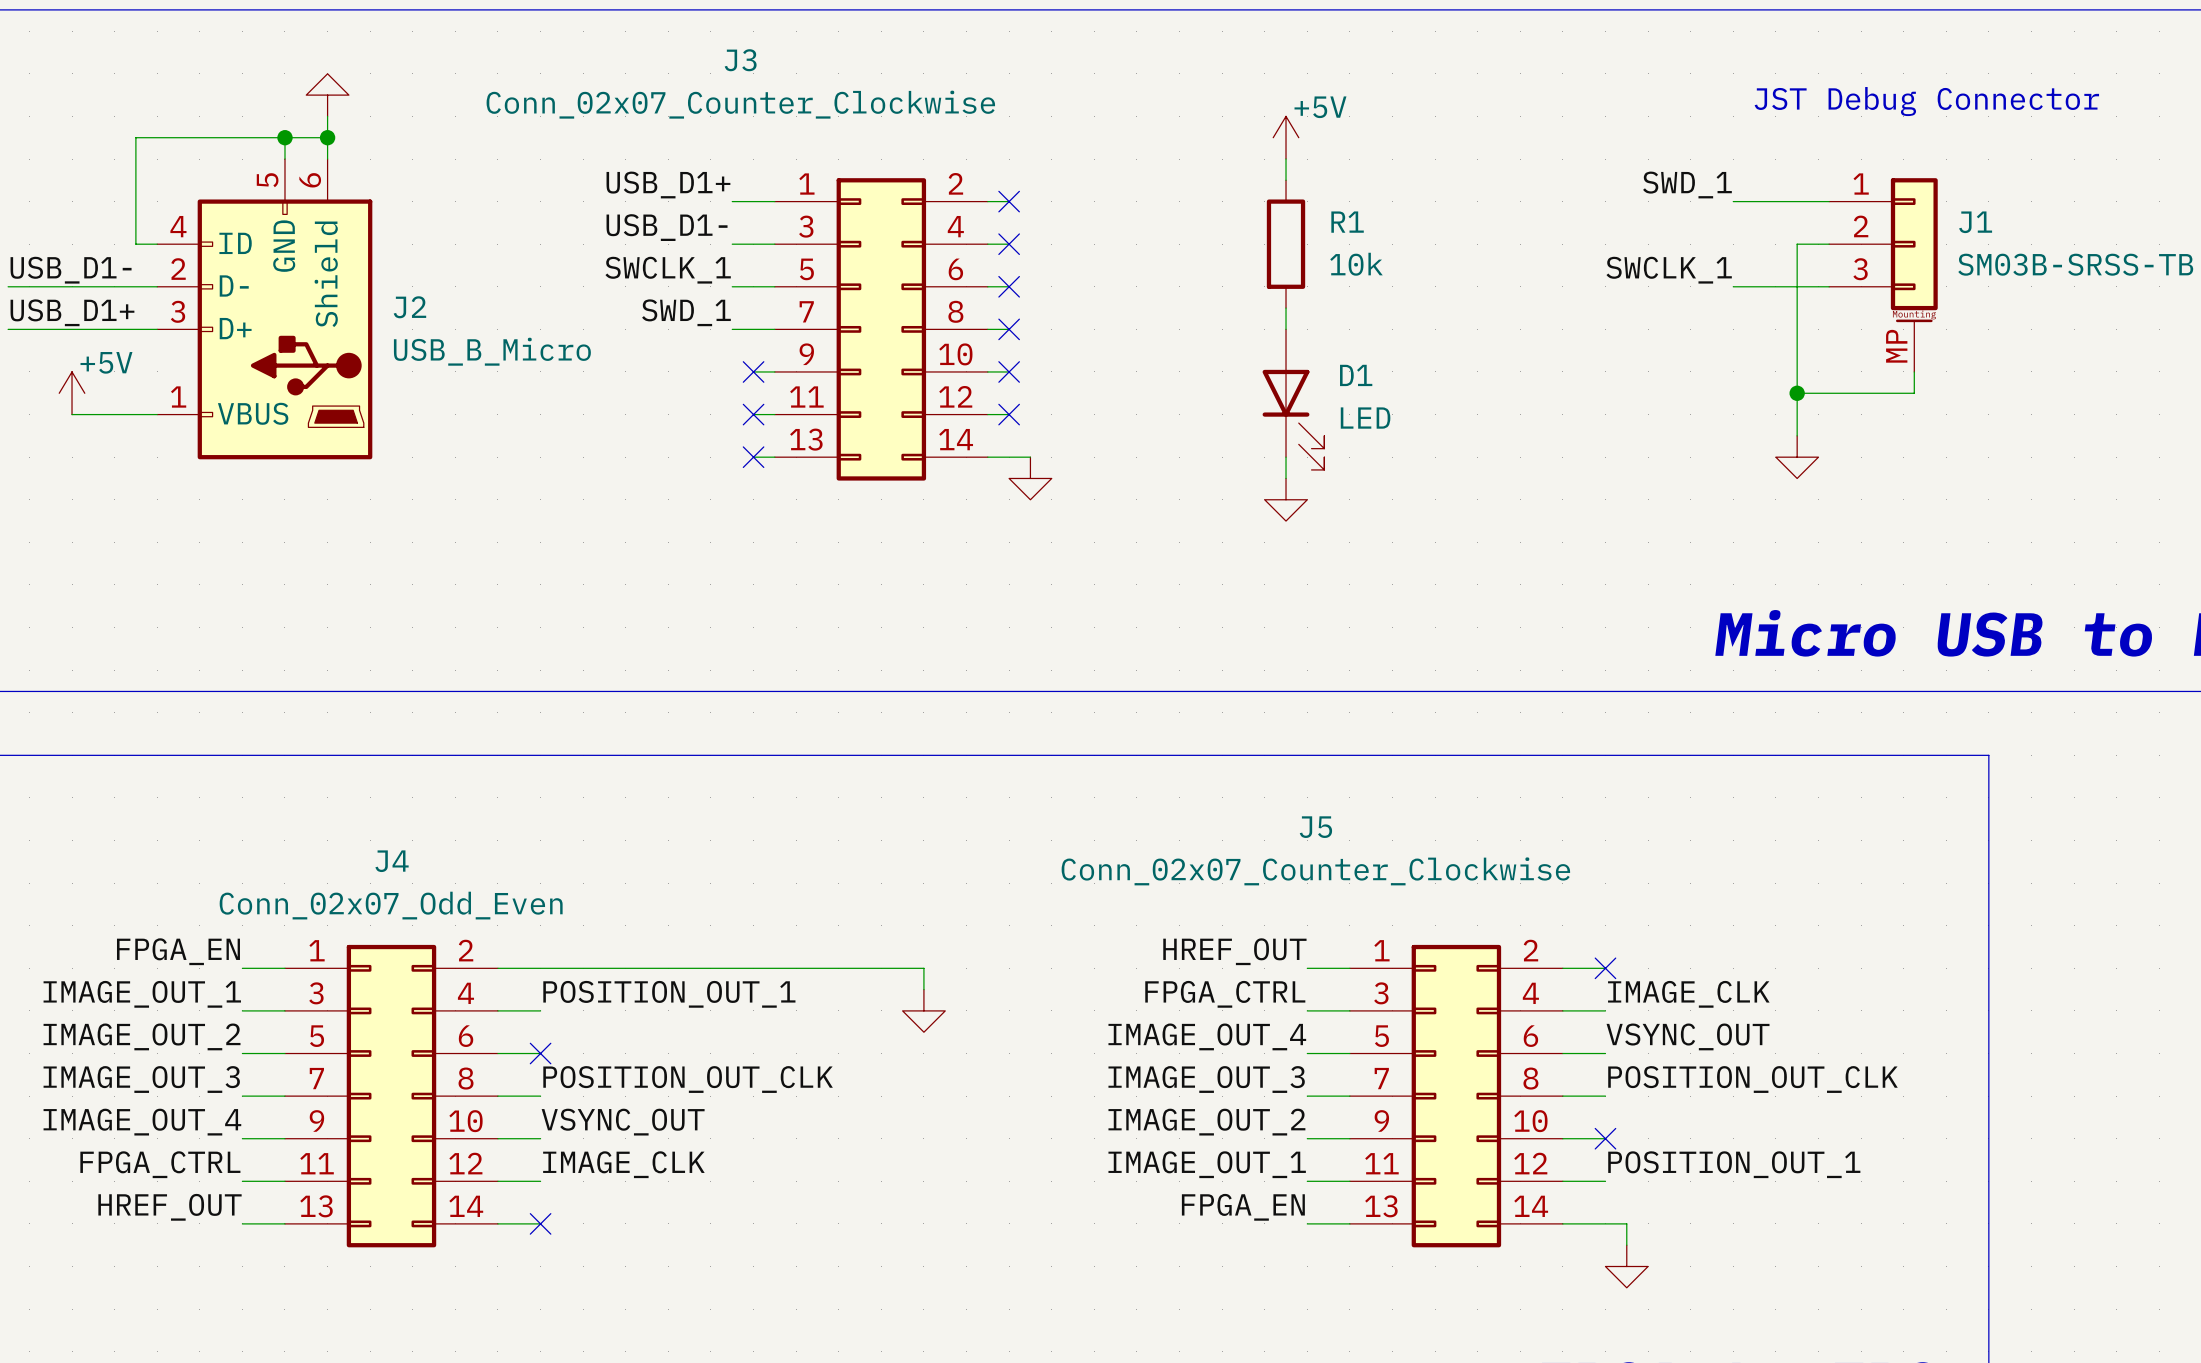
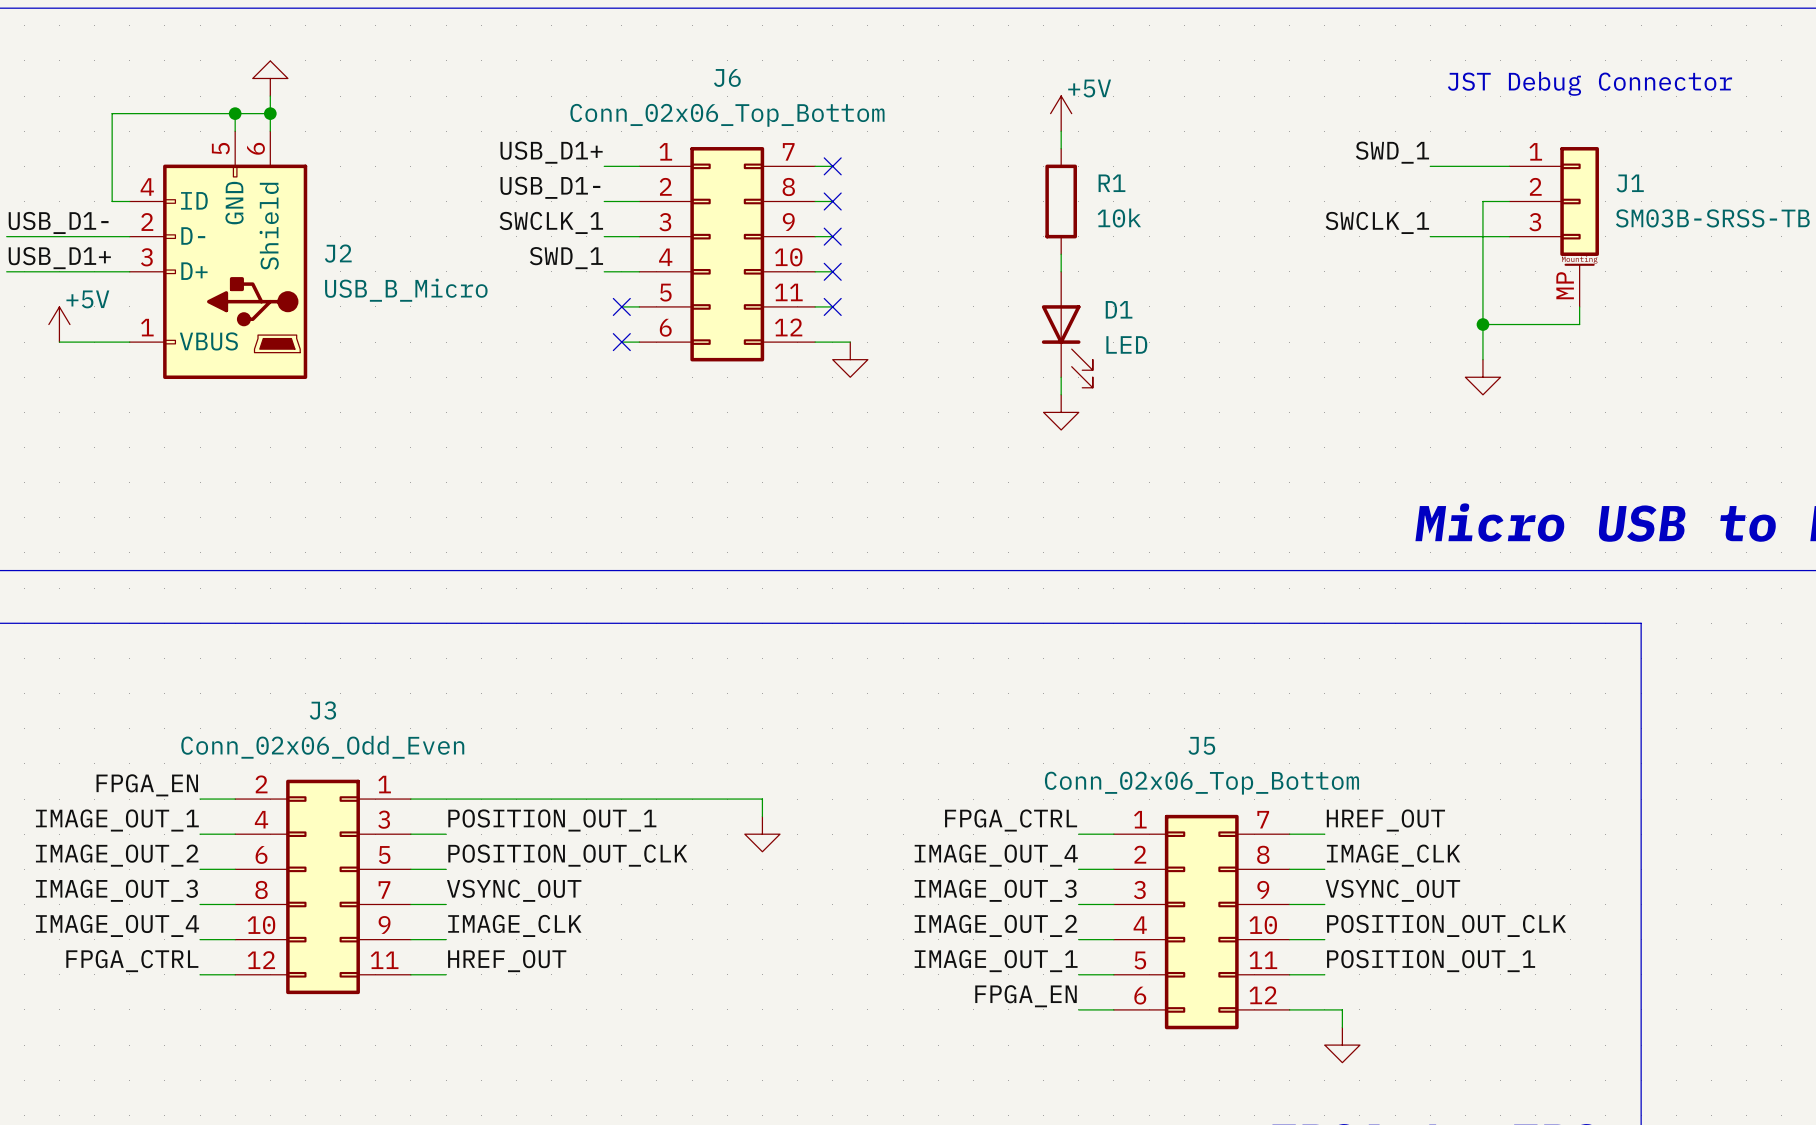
J3 name position: J3 (740, 60) -> J3 (322, 710)
J3 value: Conn_02x07_Counter_Clockwise (740, 104) -> Conn_02x06_Odd_Even (322, 747)
J3 symbol: [774, 178, 988, 481] -> [235, 779, 411, 995]
J6: none -> Conn_02x06_Top_Bottom (727, 254)
no-connect mark: (1009, 414) -> none
wire: (753, 457) (774, 457) -> (832, 342) (850, 342)
no-connect mark: (753, 457) -> none
wire: (987, 457) (1030, 457) -> none
power symbol position: (1030, 478) -> (850, 359)
J5 name position: J5 (1315, 827) -> J5 (1201, 745)
J5 value: Conn_02x07_Counter_Clockwise (1315, 871) -> Conn_02x06_Top_Bottom (1201, 783)
J5 symbol: [1349, 944, 1563, 1248] -> [1113, 814, 1290, 1030]
label: HREF_OUT (1234, 951) -> none
wire: (1307, 968) (1349, 968) -> none
wire: (1562, 968) (1605, 968) -> none
no-connect mark: (1605, 968) -> none
label: IMAGE_CLK (1688, 994) -> HREF_OUT (1385, 820)
label: none -> POSITION_OUT_CLK (567, 855)
label: VSYNC_OUT (1688, 1036) -> IMAGE_CLK (1393, 855)
no-connect mark: (540, 1053) -> none
label: POSITION_OUT_CLK (688, 1079) -> VSYNC_OUT (514, 890)
label: POSITION_OUT_CLK (1752, 1079) -> VSYNC_OUT (1392, 890)
J4: Conn_02x07_Odd_Even (391, 1096) -> none
label: VSYNC_OUT (623, 1122) -> IMAGE_CLK (514, 925)
label: none -> POSITION_OUT_CLK (1446, 925)
no-connect mark: (1605, 1138) -> none
label: IMAGE_CLK (623, 1164) -> HREF_OUT (507, 961)
label: HREF_OUT (170, 1207) -> none
wire: (242, 1223) (284, 1223) -> none
wire: (497, 1223) (540, 1223) -> none
no-connect mark: (540, 1223) -> none

